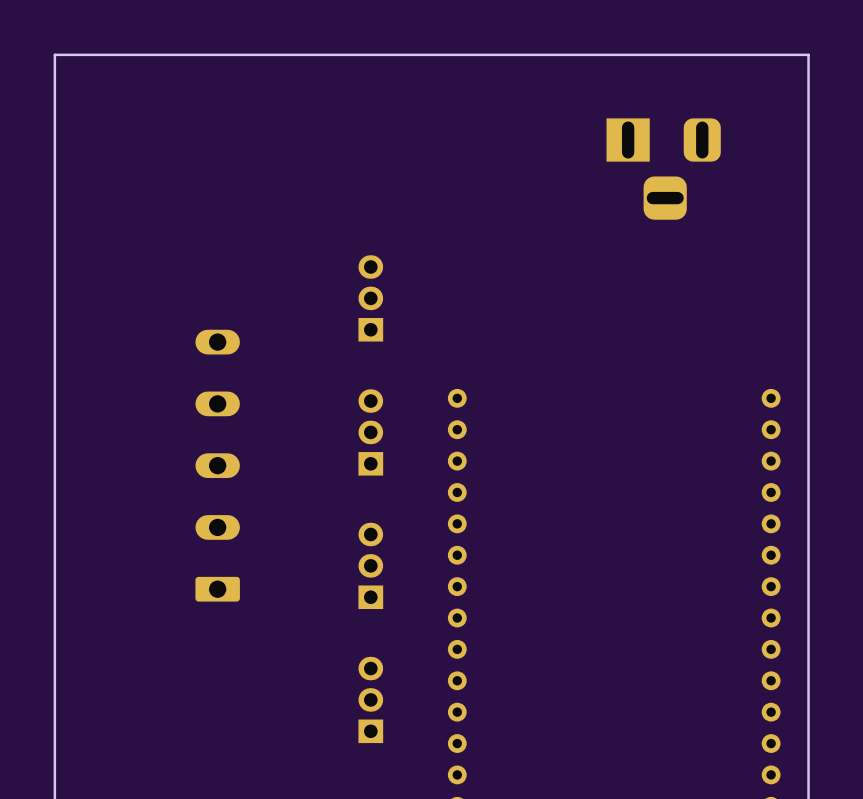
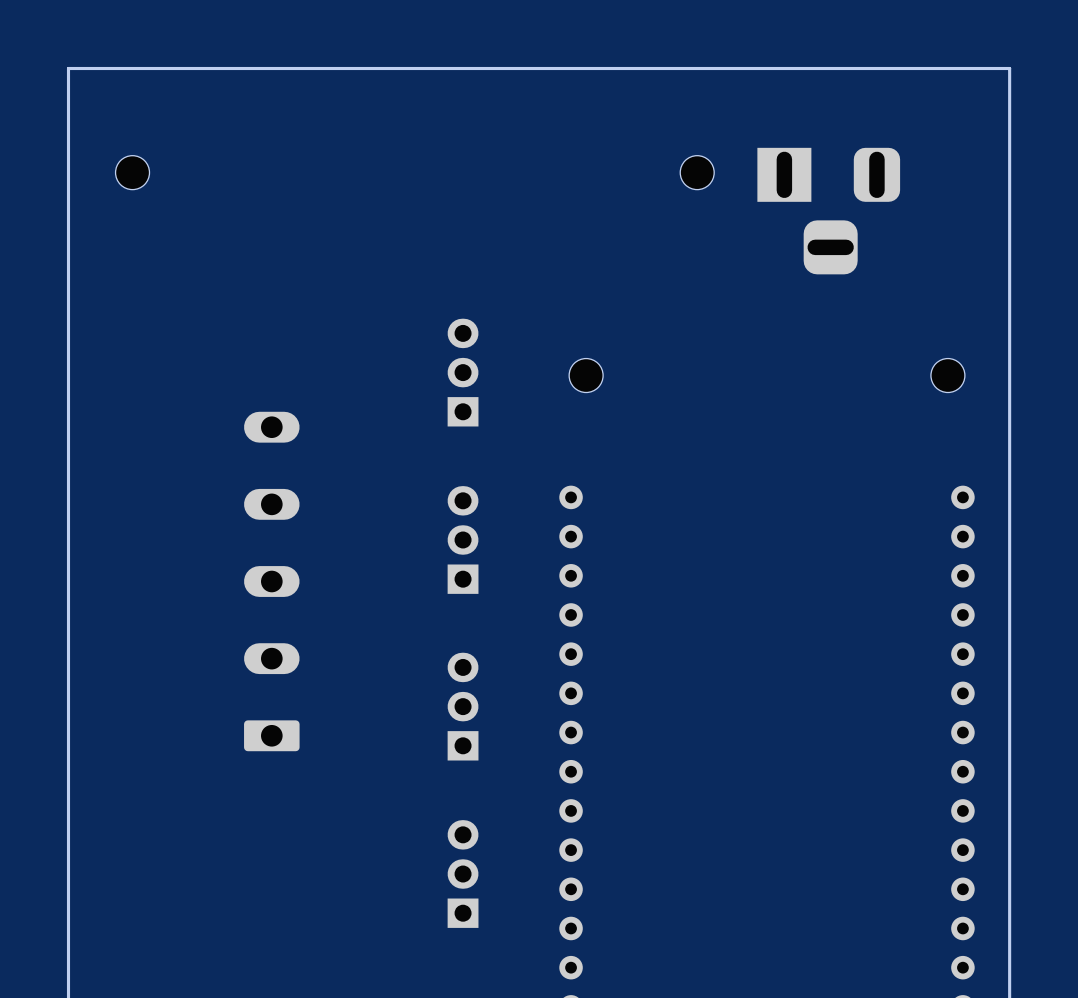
part: none -> (132, 172)
part: none -> (697, 172)
part: none -> (586, 375)
part: none -> (947, 375)

